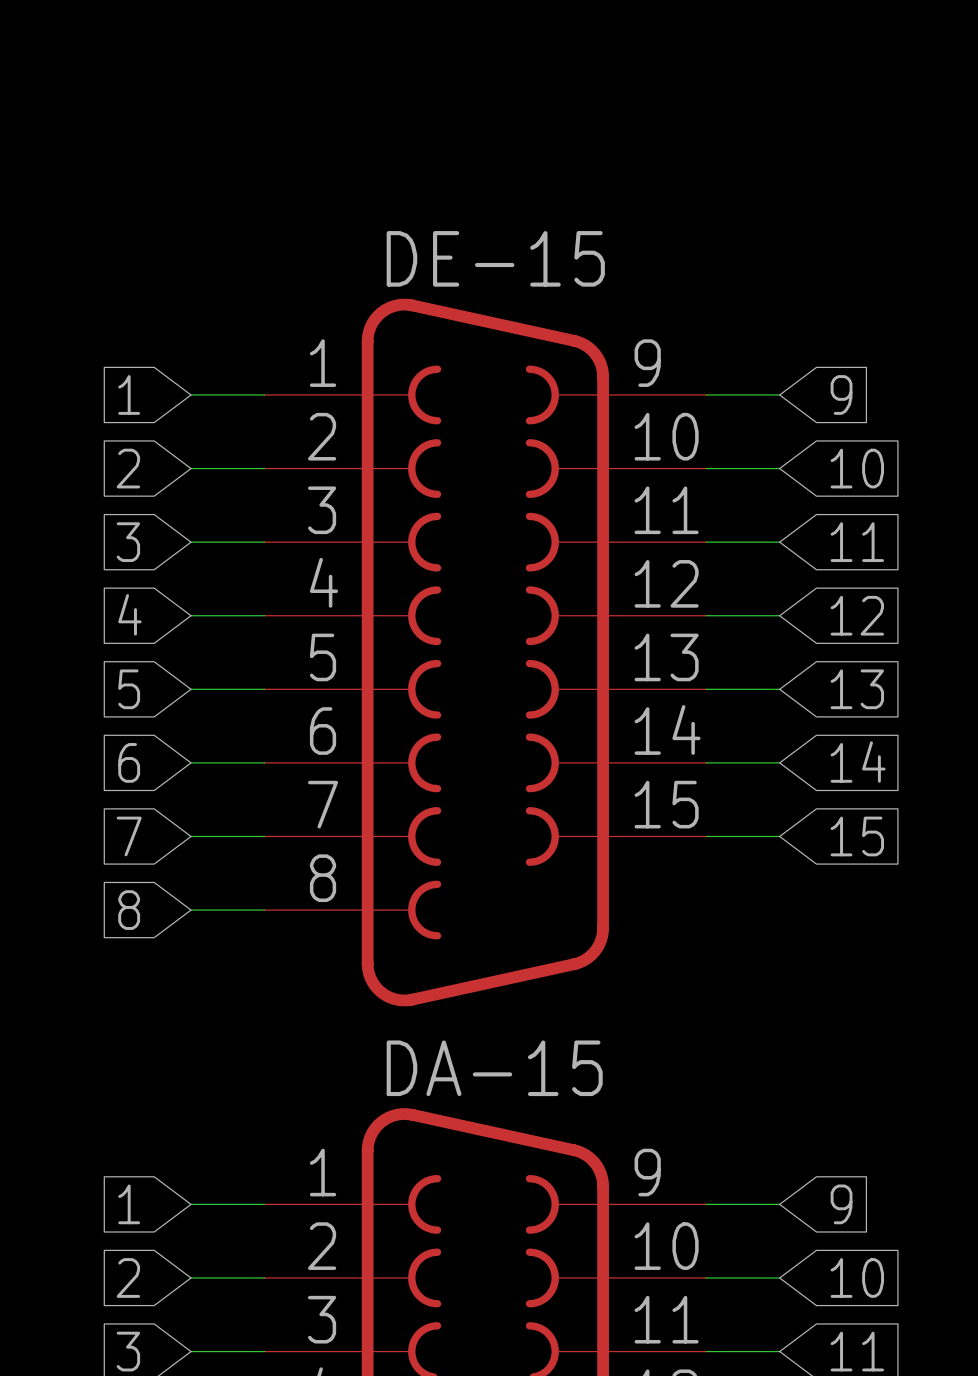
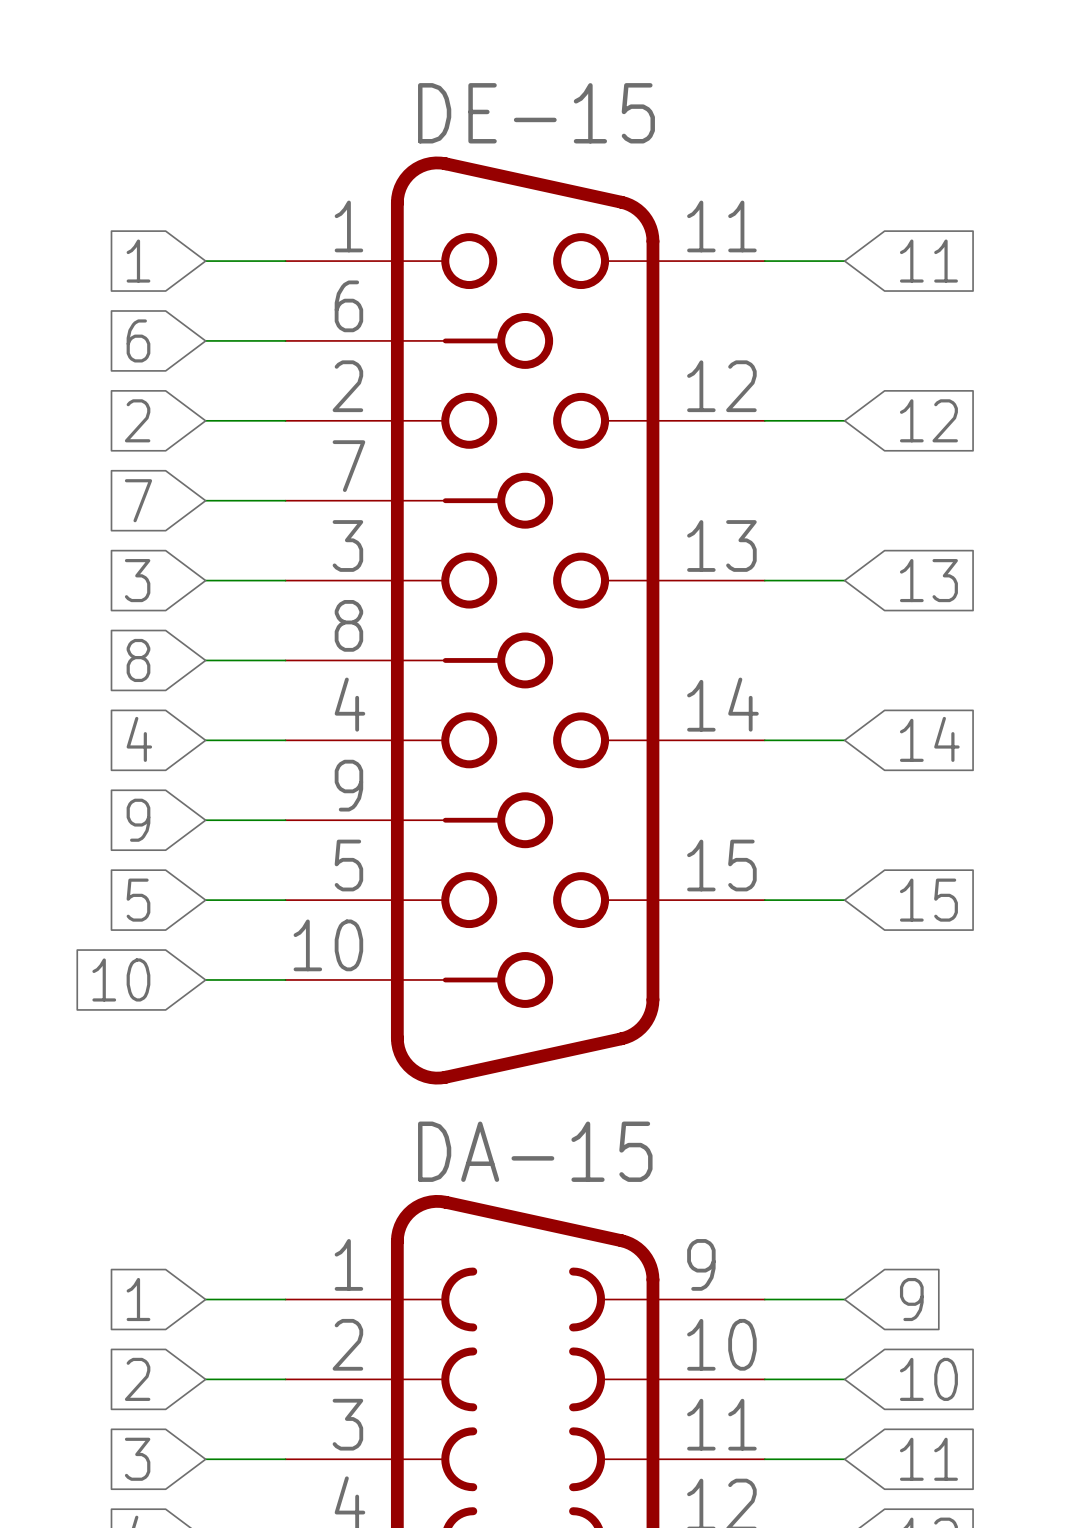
global label: none -> 1 (138, 261)
wire: none -> (205, 261) (285, 261)
global label: none -> 11 (928, 261)
DE-15 name position: DE-15 (495, 258) -> DE-15 (536, 113)
DE-15 symbol: [264, 298, 707, 1007] -> [285, 156, 765, 1085]
global label: none -> 6 (138, 340)
global label: 1 (129, 394) -> 2 (137, 420)
global label: 9 (841, 394) -> 12 (928, 420)
global label: 2 (128, 468) -> 7 (138, 500)
wire: (706, 468) (779, 468) -> (764, 261) (844, 261)
global label: 10 (857, 468) -> none
global label: 11 (857, 542) -> 13 (928, 580)
global label: 4 (129, 614) -> 8 (138, 660)
wire: (706, 615) (779, 615) -> (205, 340) (285, 340)
global label: 12 (857, 615) -> none
global label: 5 (129, 689) -> 4 (139, 739)
global label: 13 (857, 689) -> 14 (929, 739)
global label: 6 (129, 762) -> 9 (138, 820)
wire: (706, 762) (779, 762) -> none
global label: 14 (858, 762) -> none
global label: 7 (129, 836) -> 5 (138, 900)
global label: 8 (129, 910) -> 10 (121, 979)

